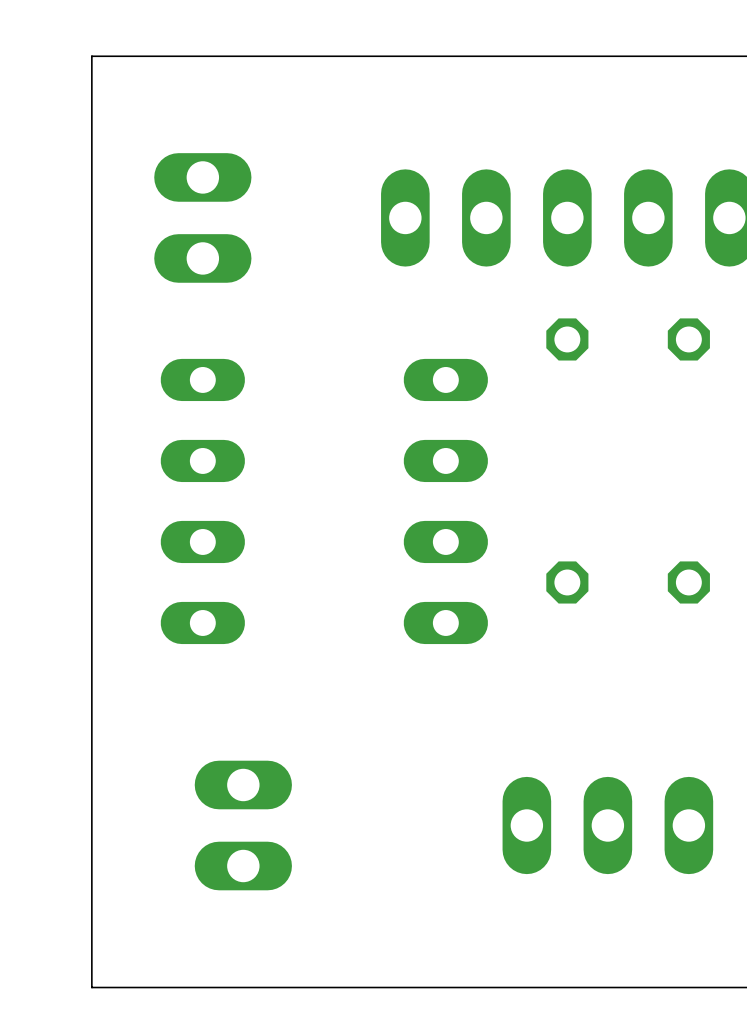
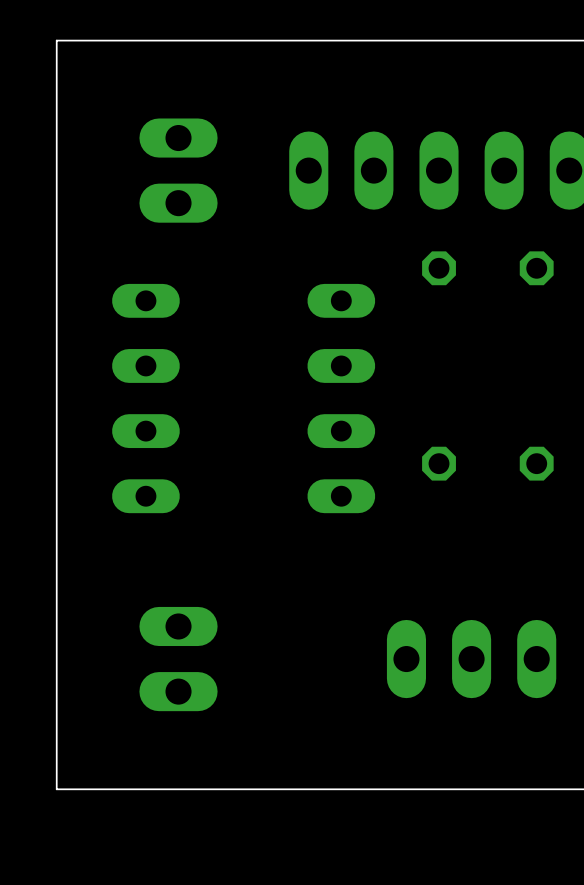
part position: (202, 217) -> (178, 170)

